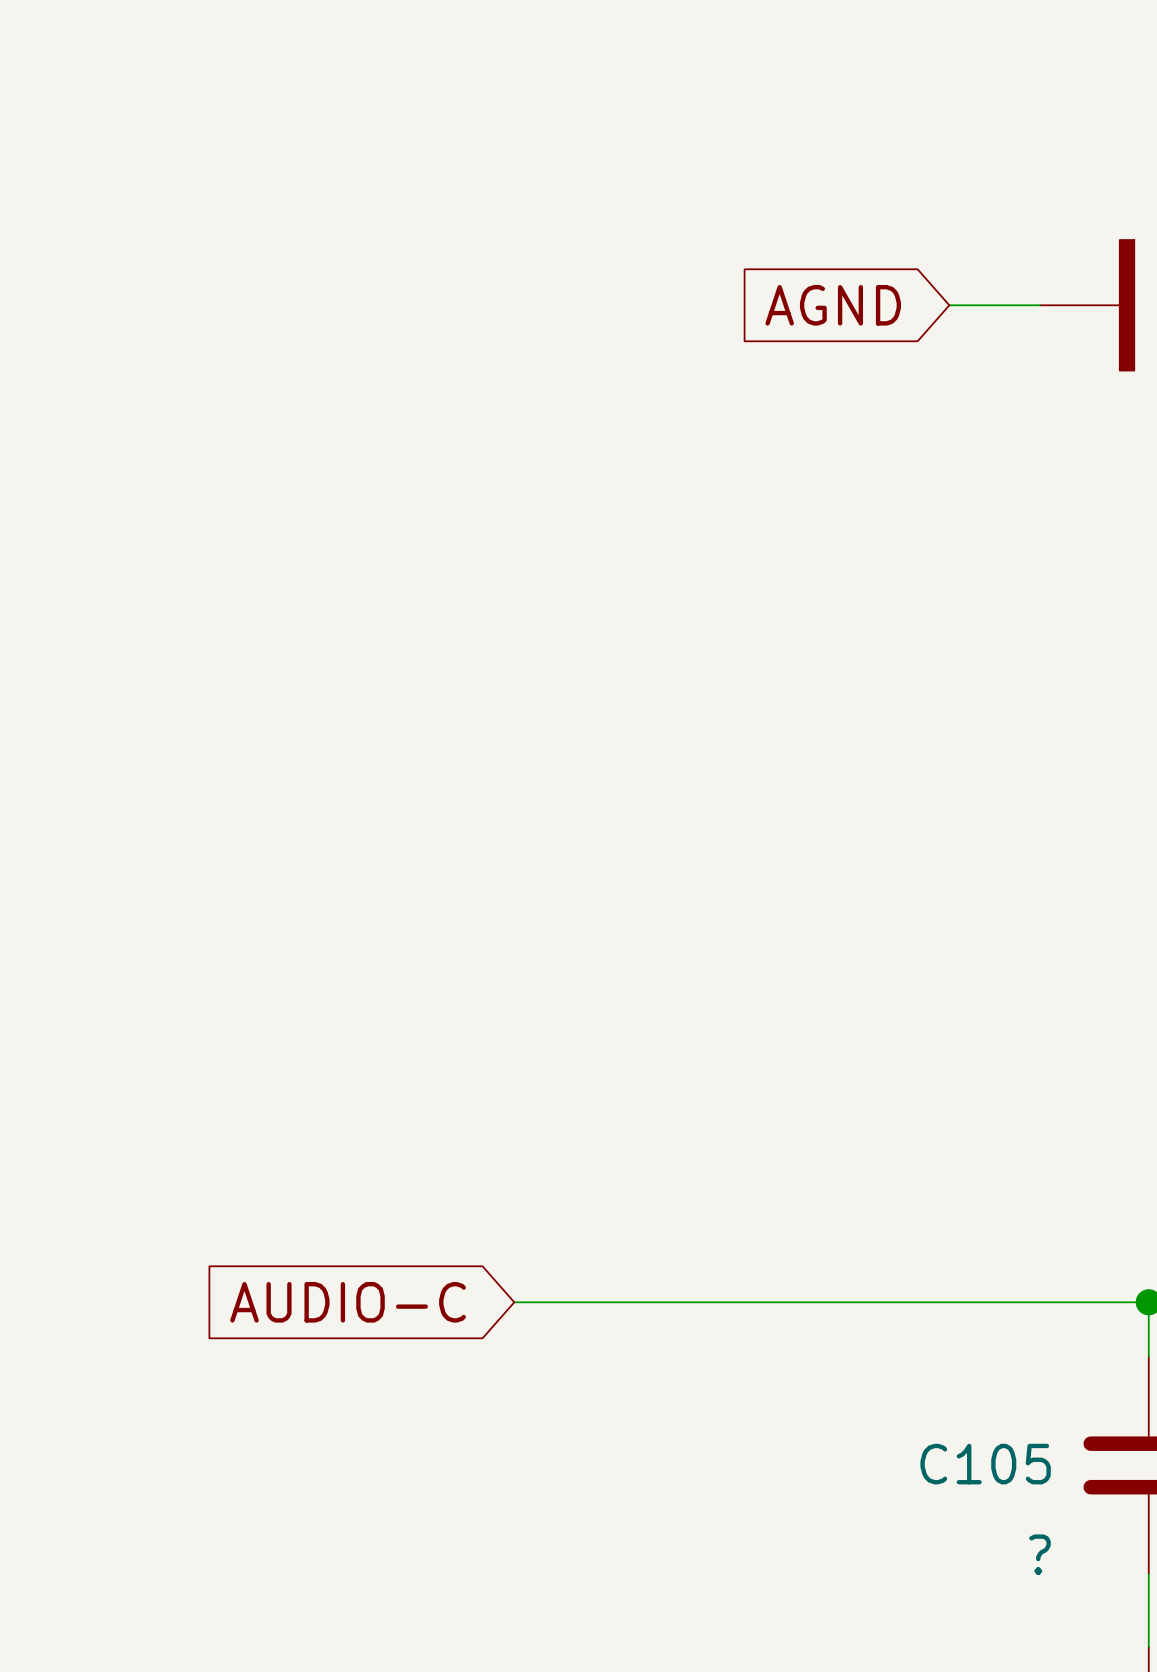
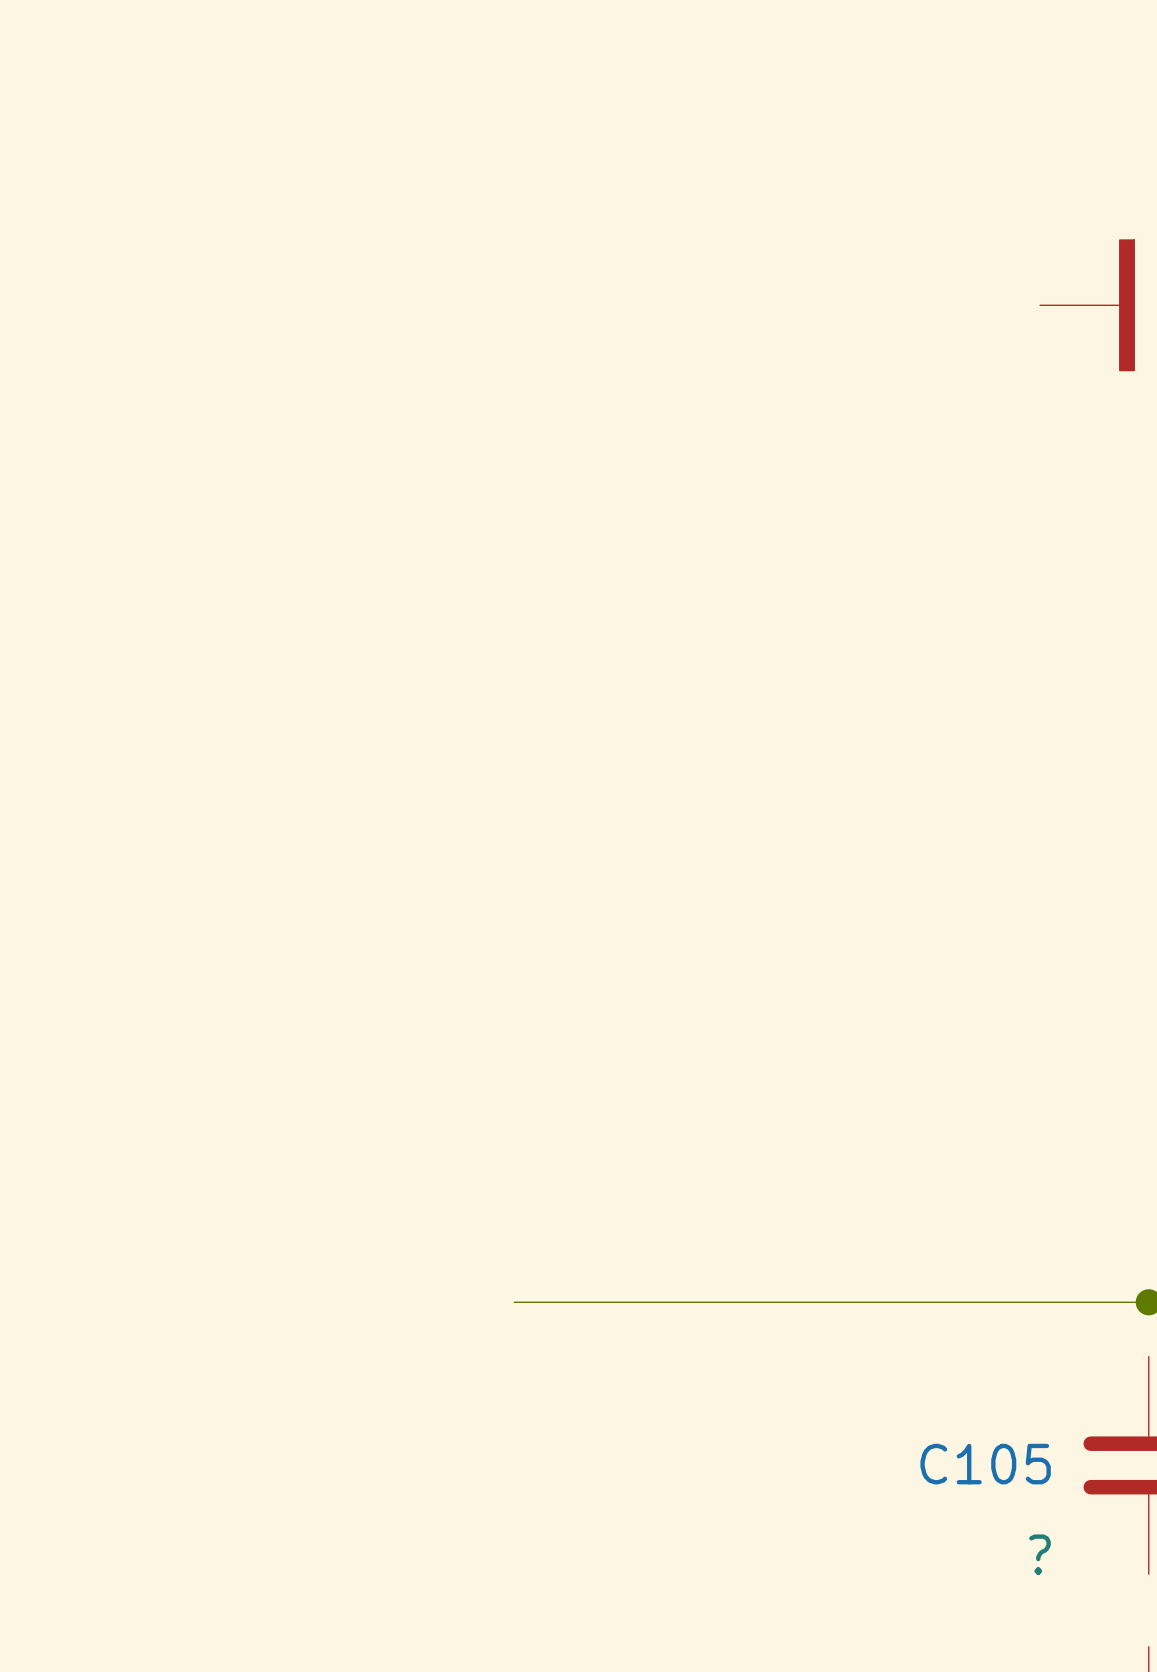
global label: AGND (833, 305) -> none
wire: (949, 305) (1039, 305) -> none
global label: AUDIO-C (348, 1302) -> none
wire: (1148, 1302) (1148, 1356) -> none
wire: (1148, 1574) (1148, 1646) -> none

